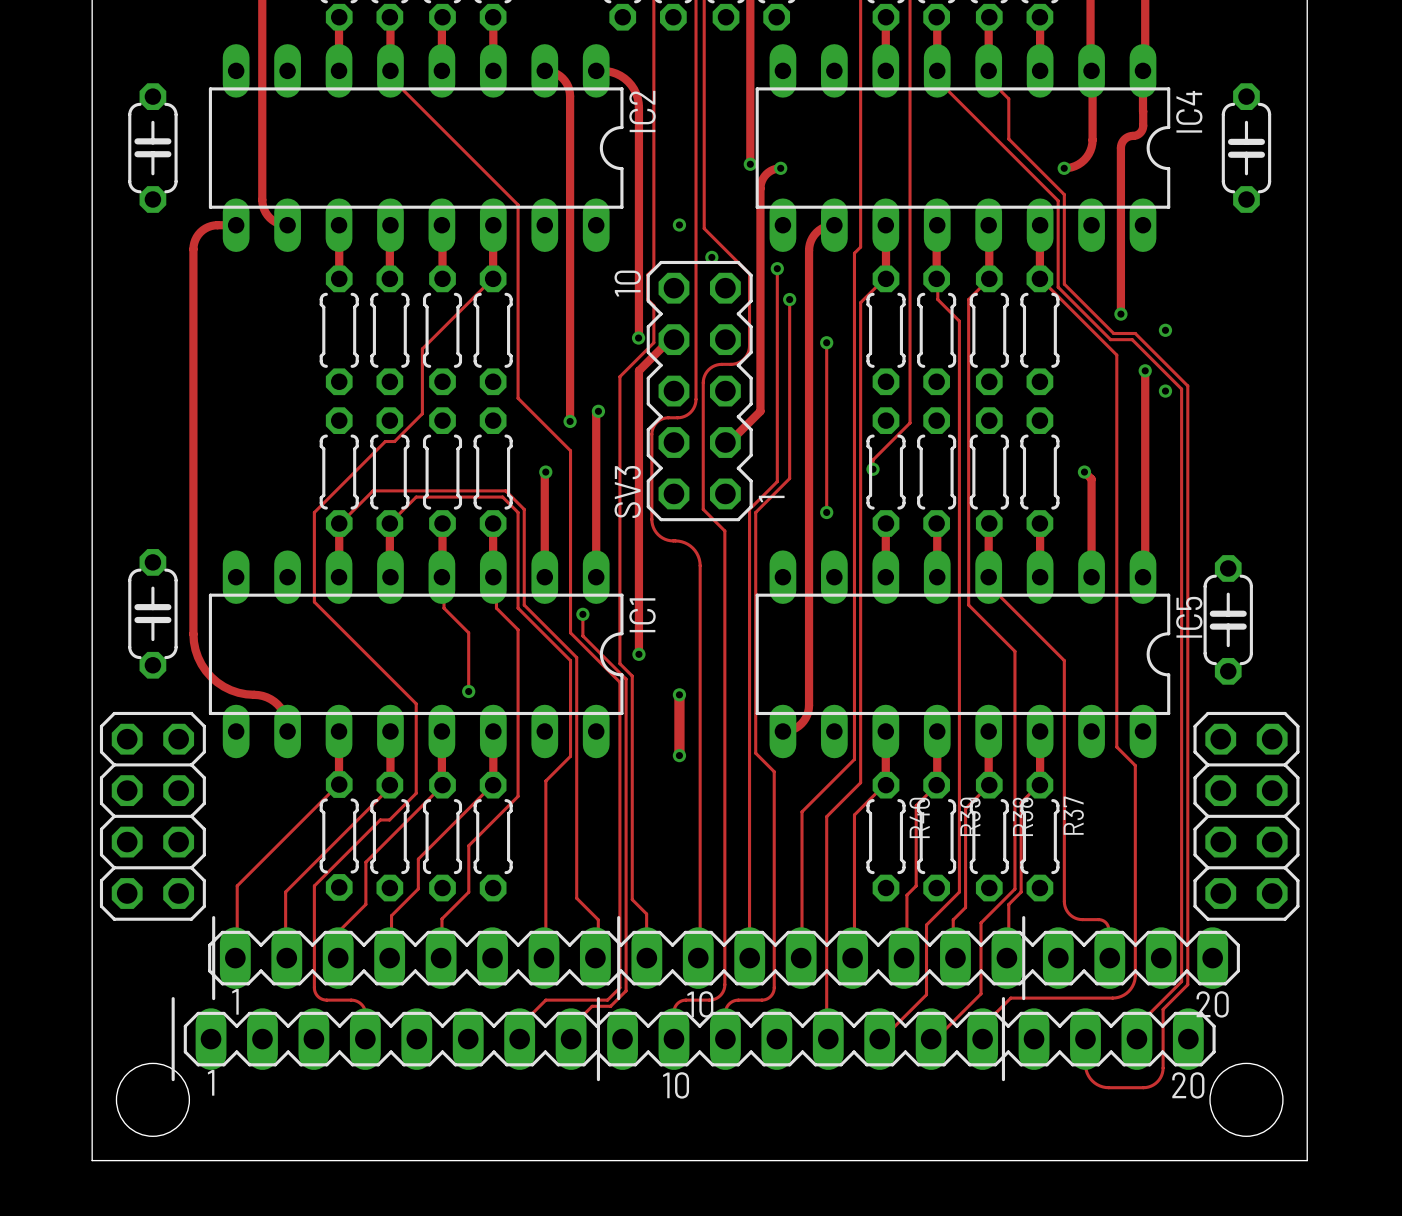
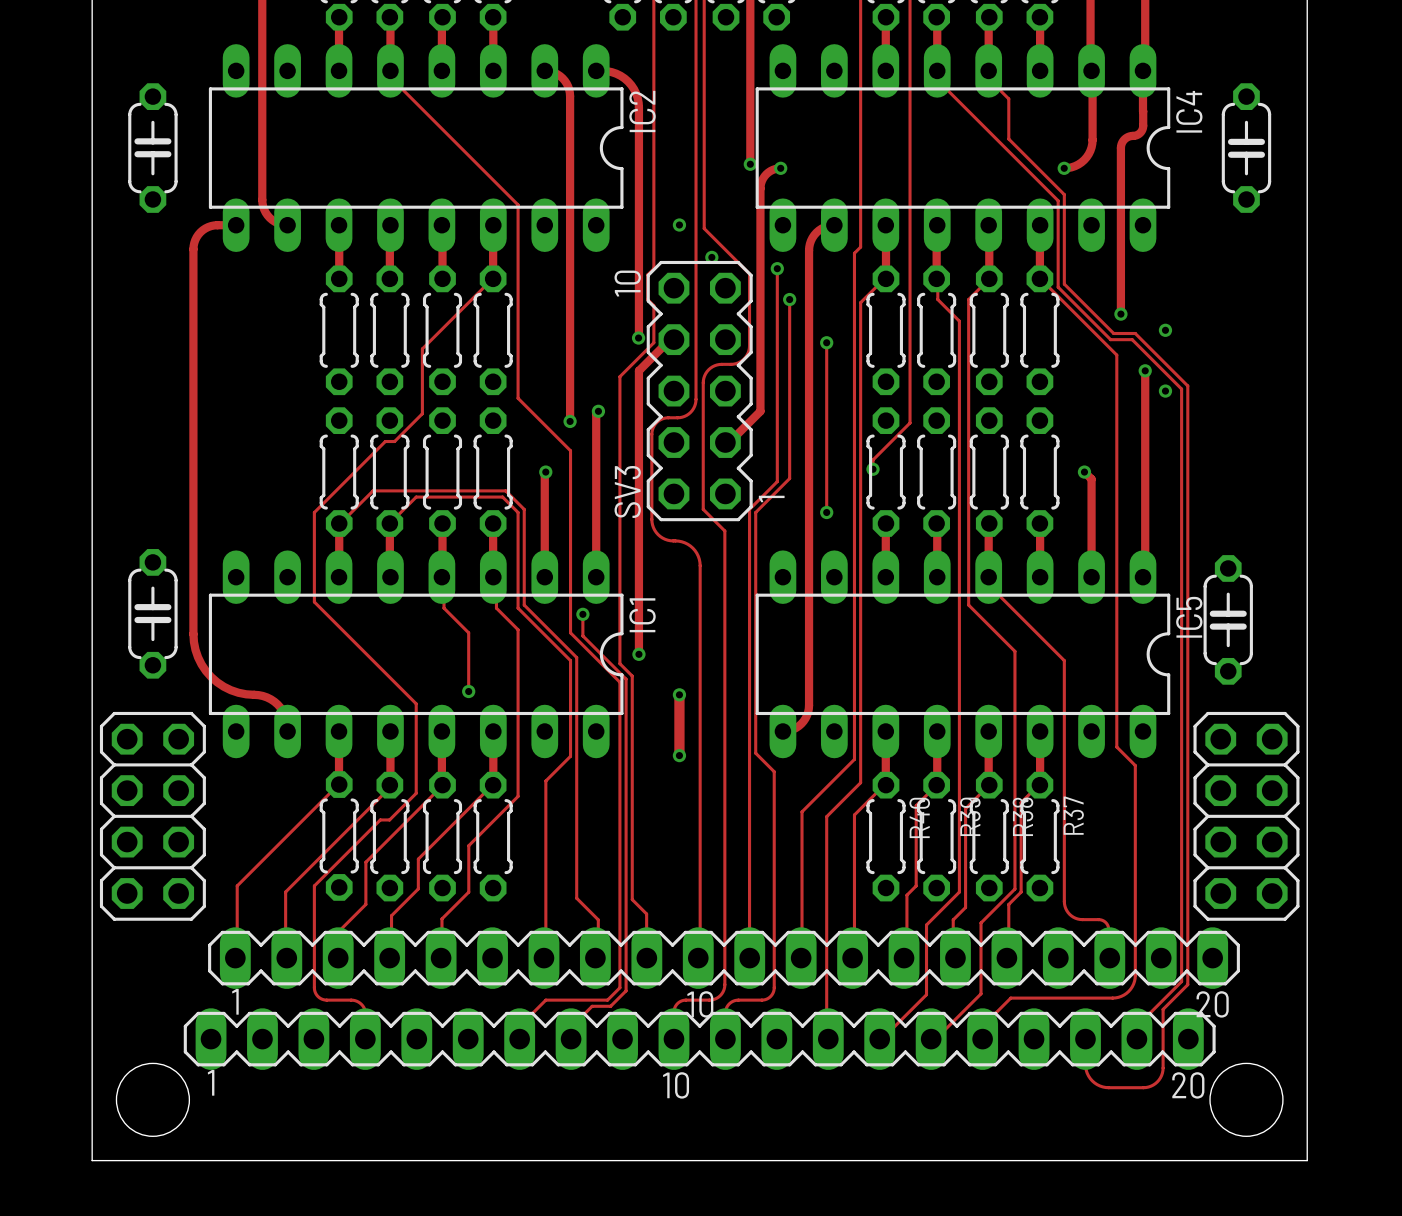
line: (213, 917) (213, 998) -> none
line: (618, 917) (618, 998) -> none
line: (1023, 917) (1023, 998) -> none
line: (173, 998) (173, 1079) -> none
line: (598, 998) (598, 1079) -> none
line: (1003, 998) (1003, 1079) -> none

